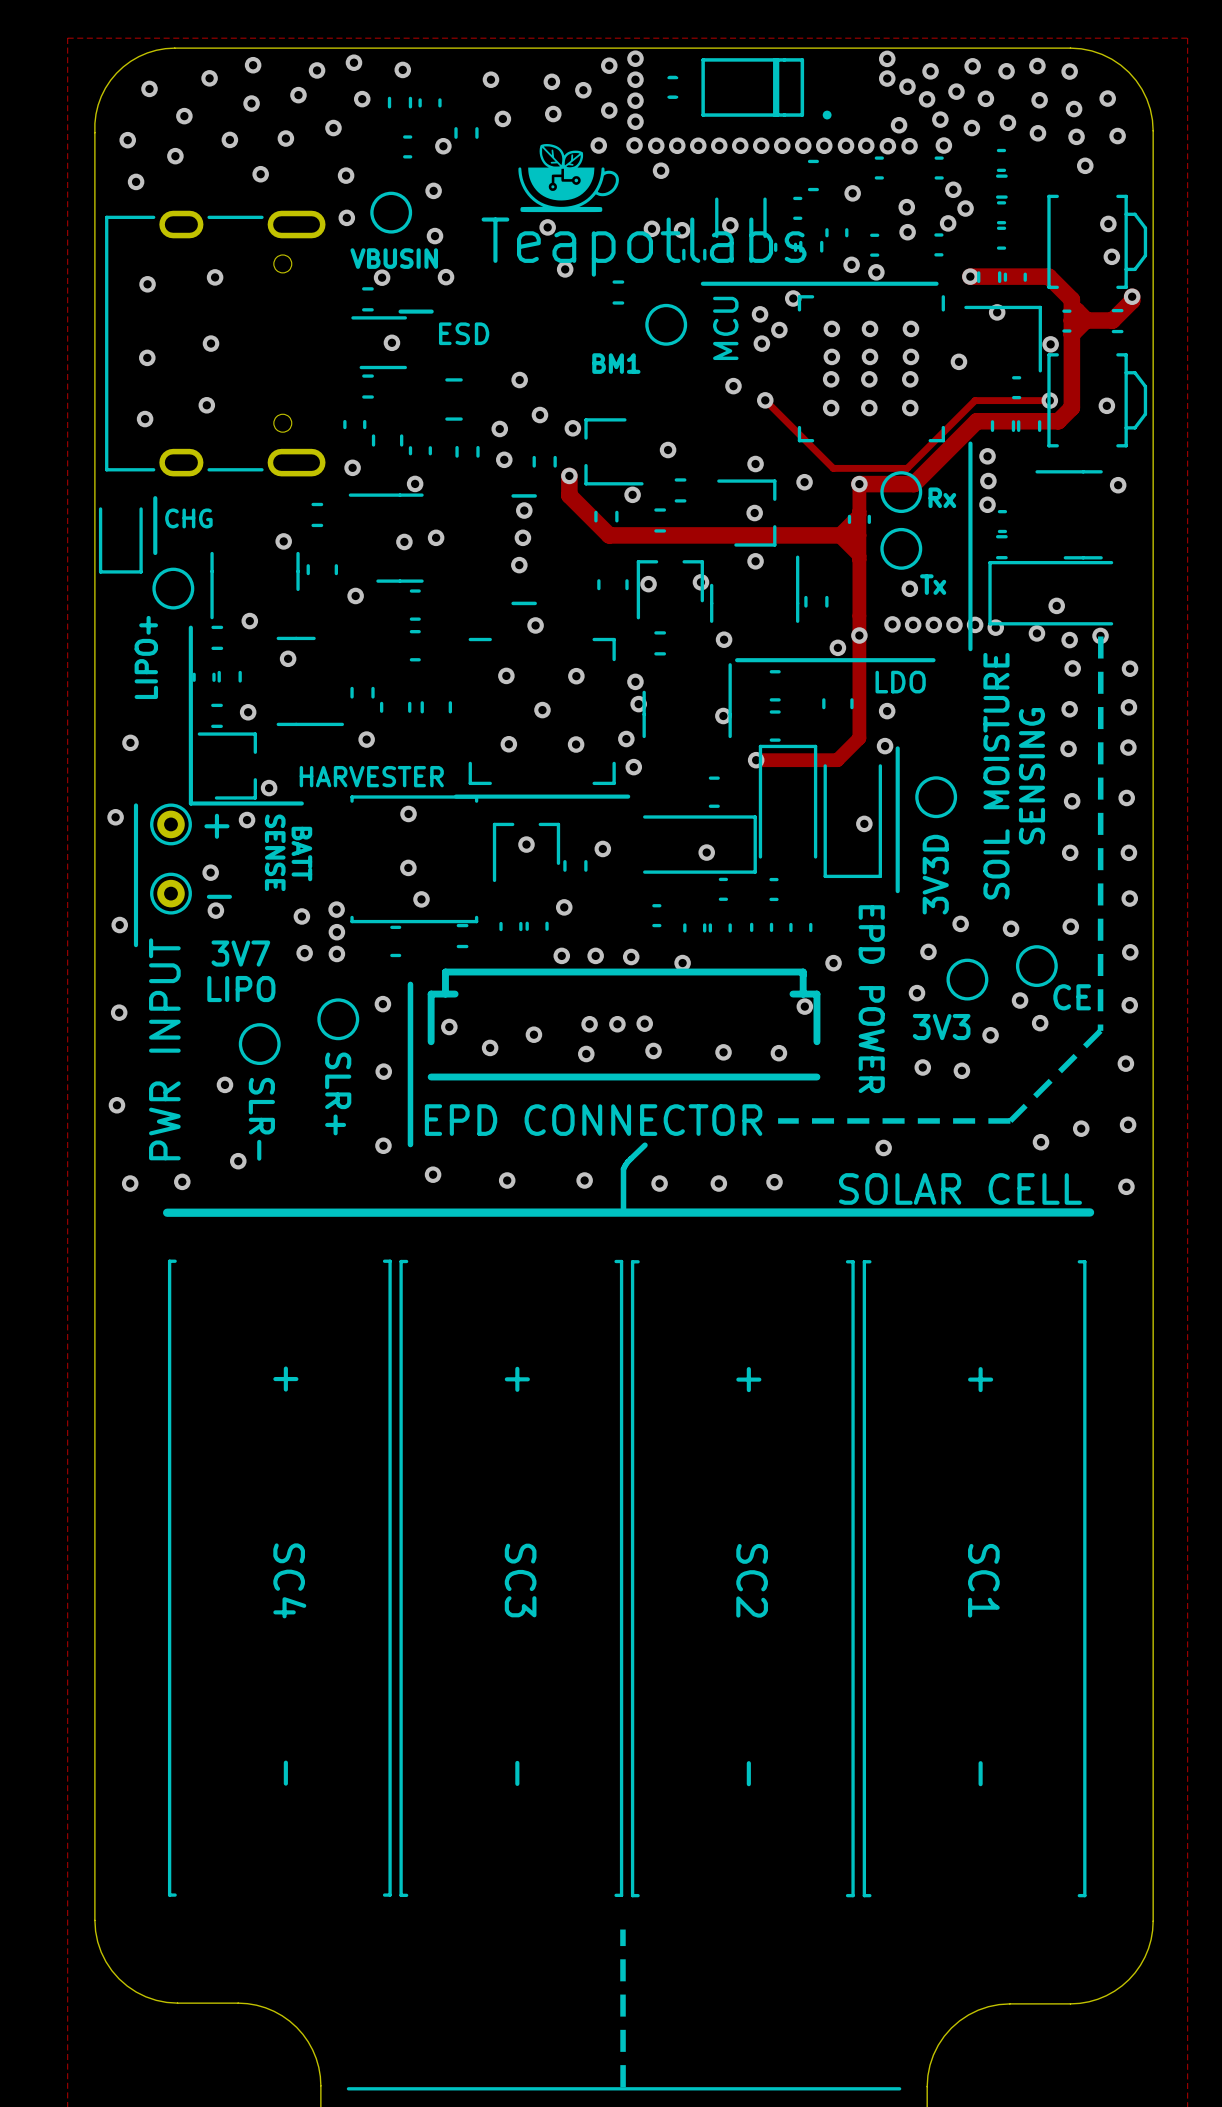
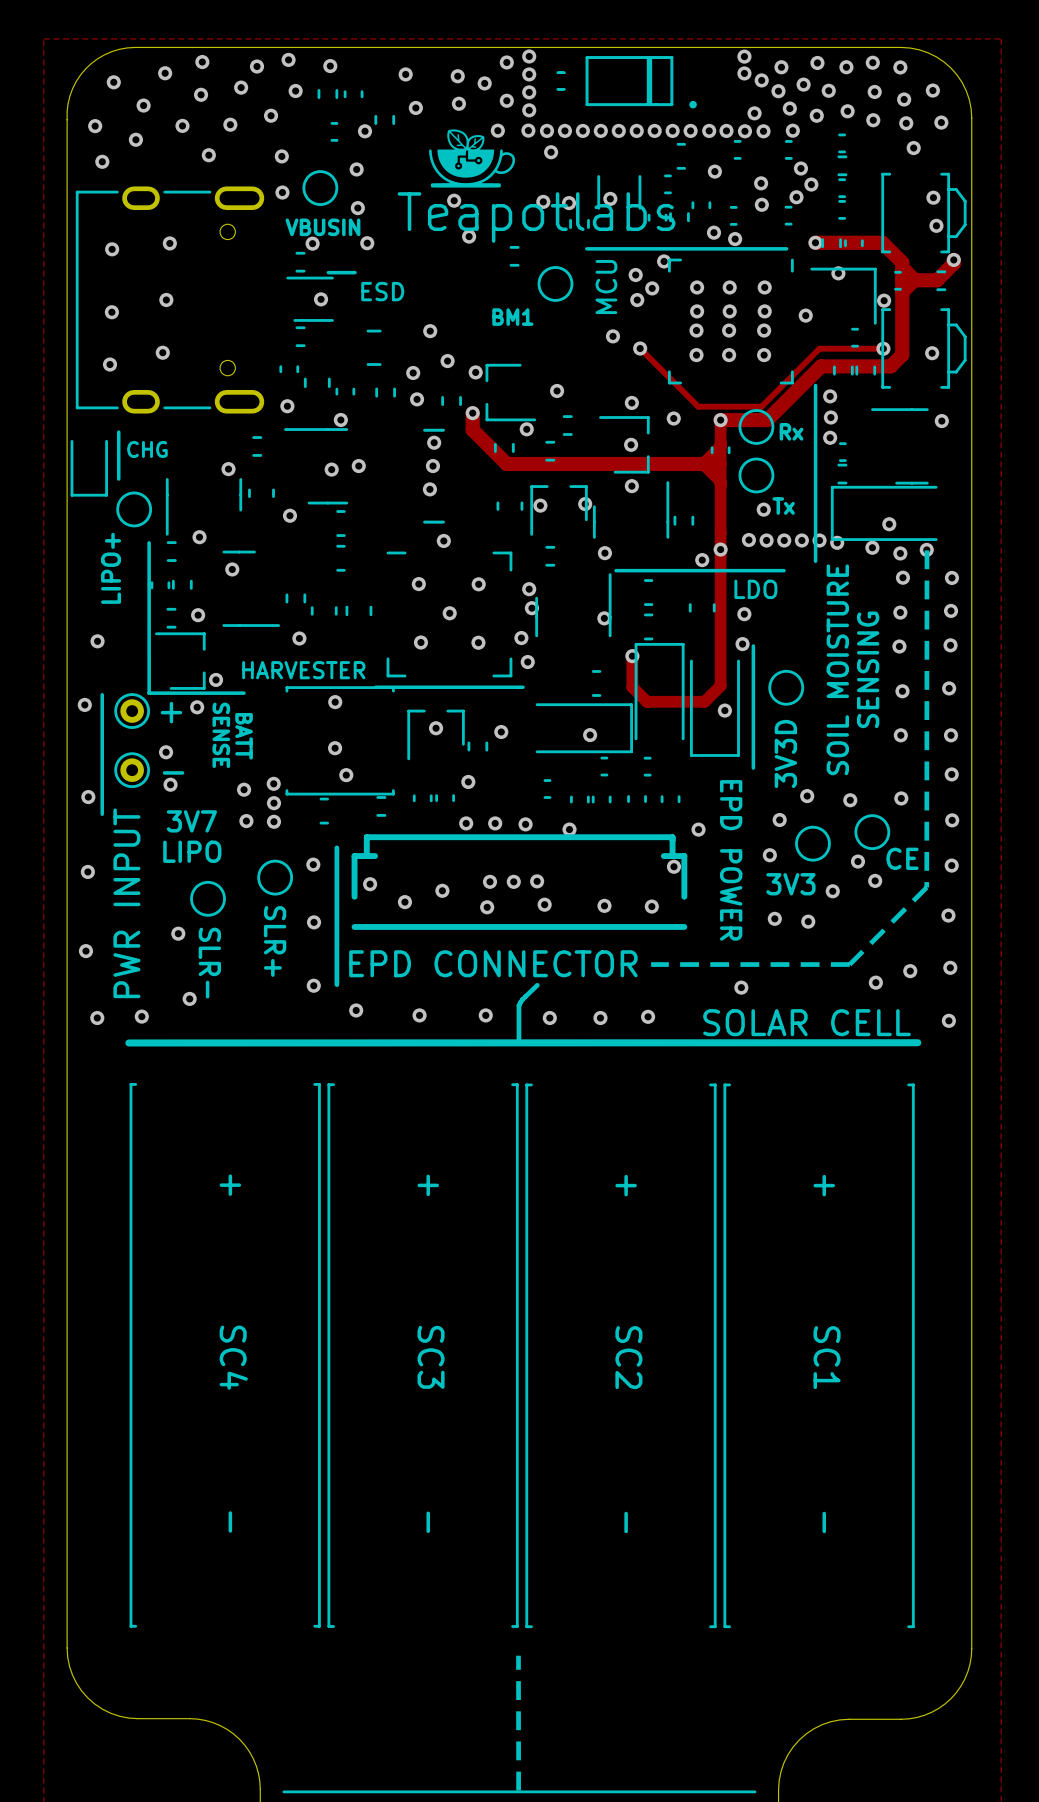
track: (859, 738) (837, 760) (756, 760) -> (720, 637) (720, 685) (704, 701) (646, 701) (632, 687) (632, 656)

